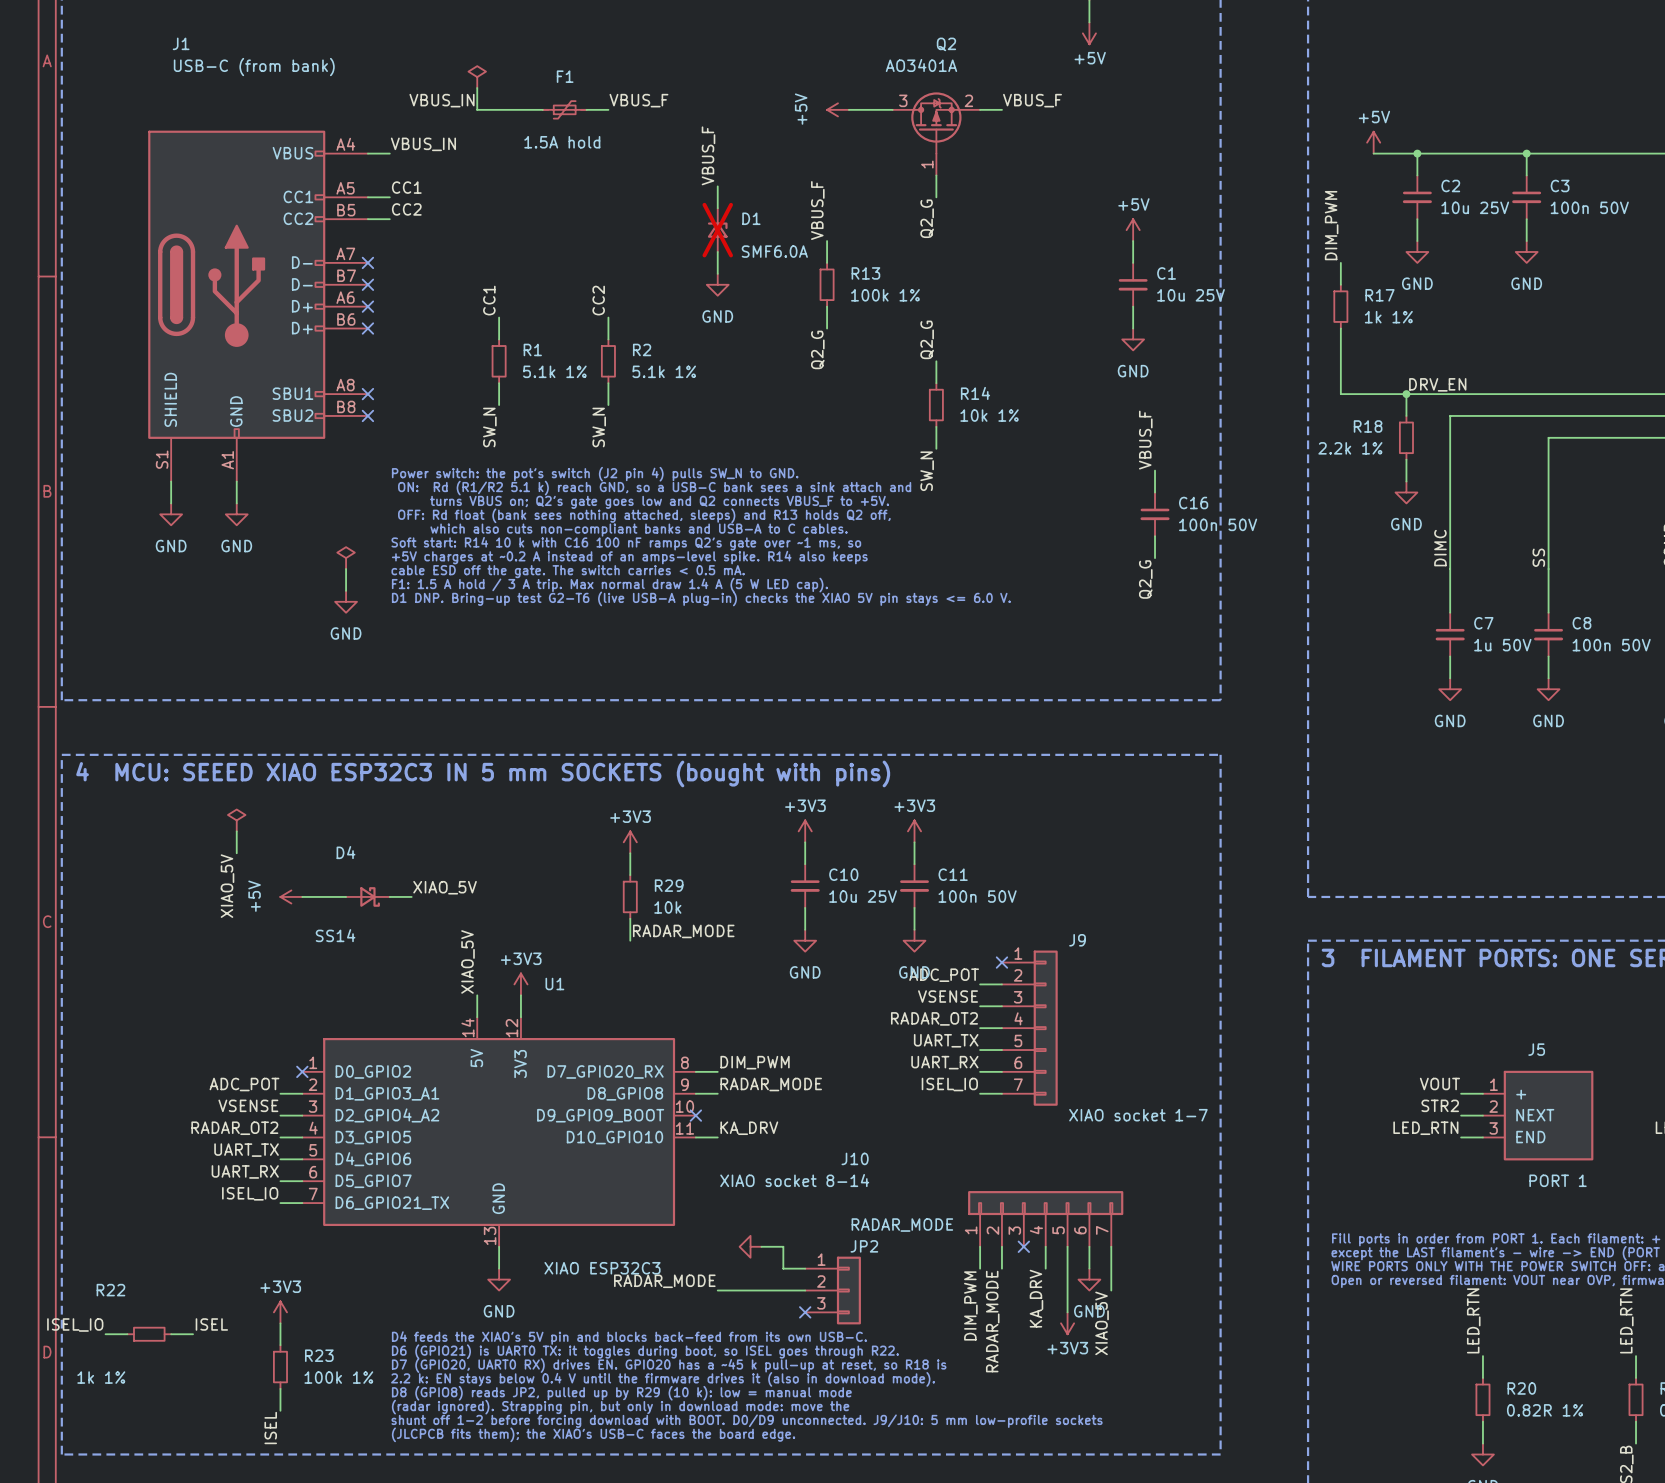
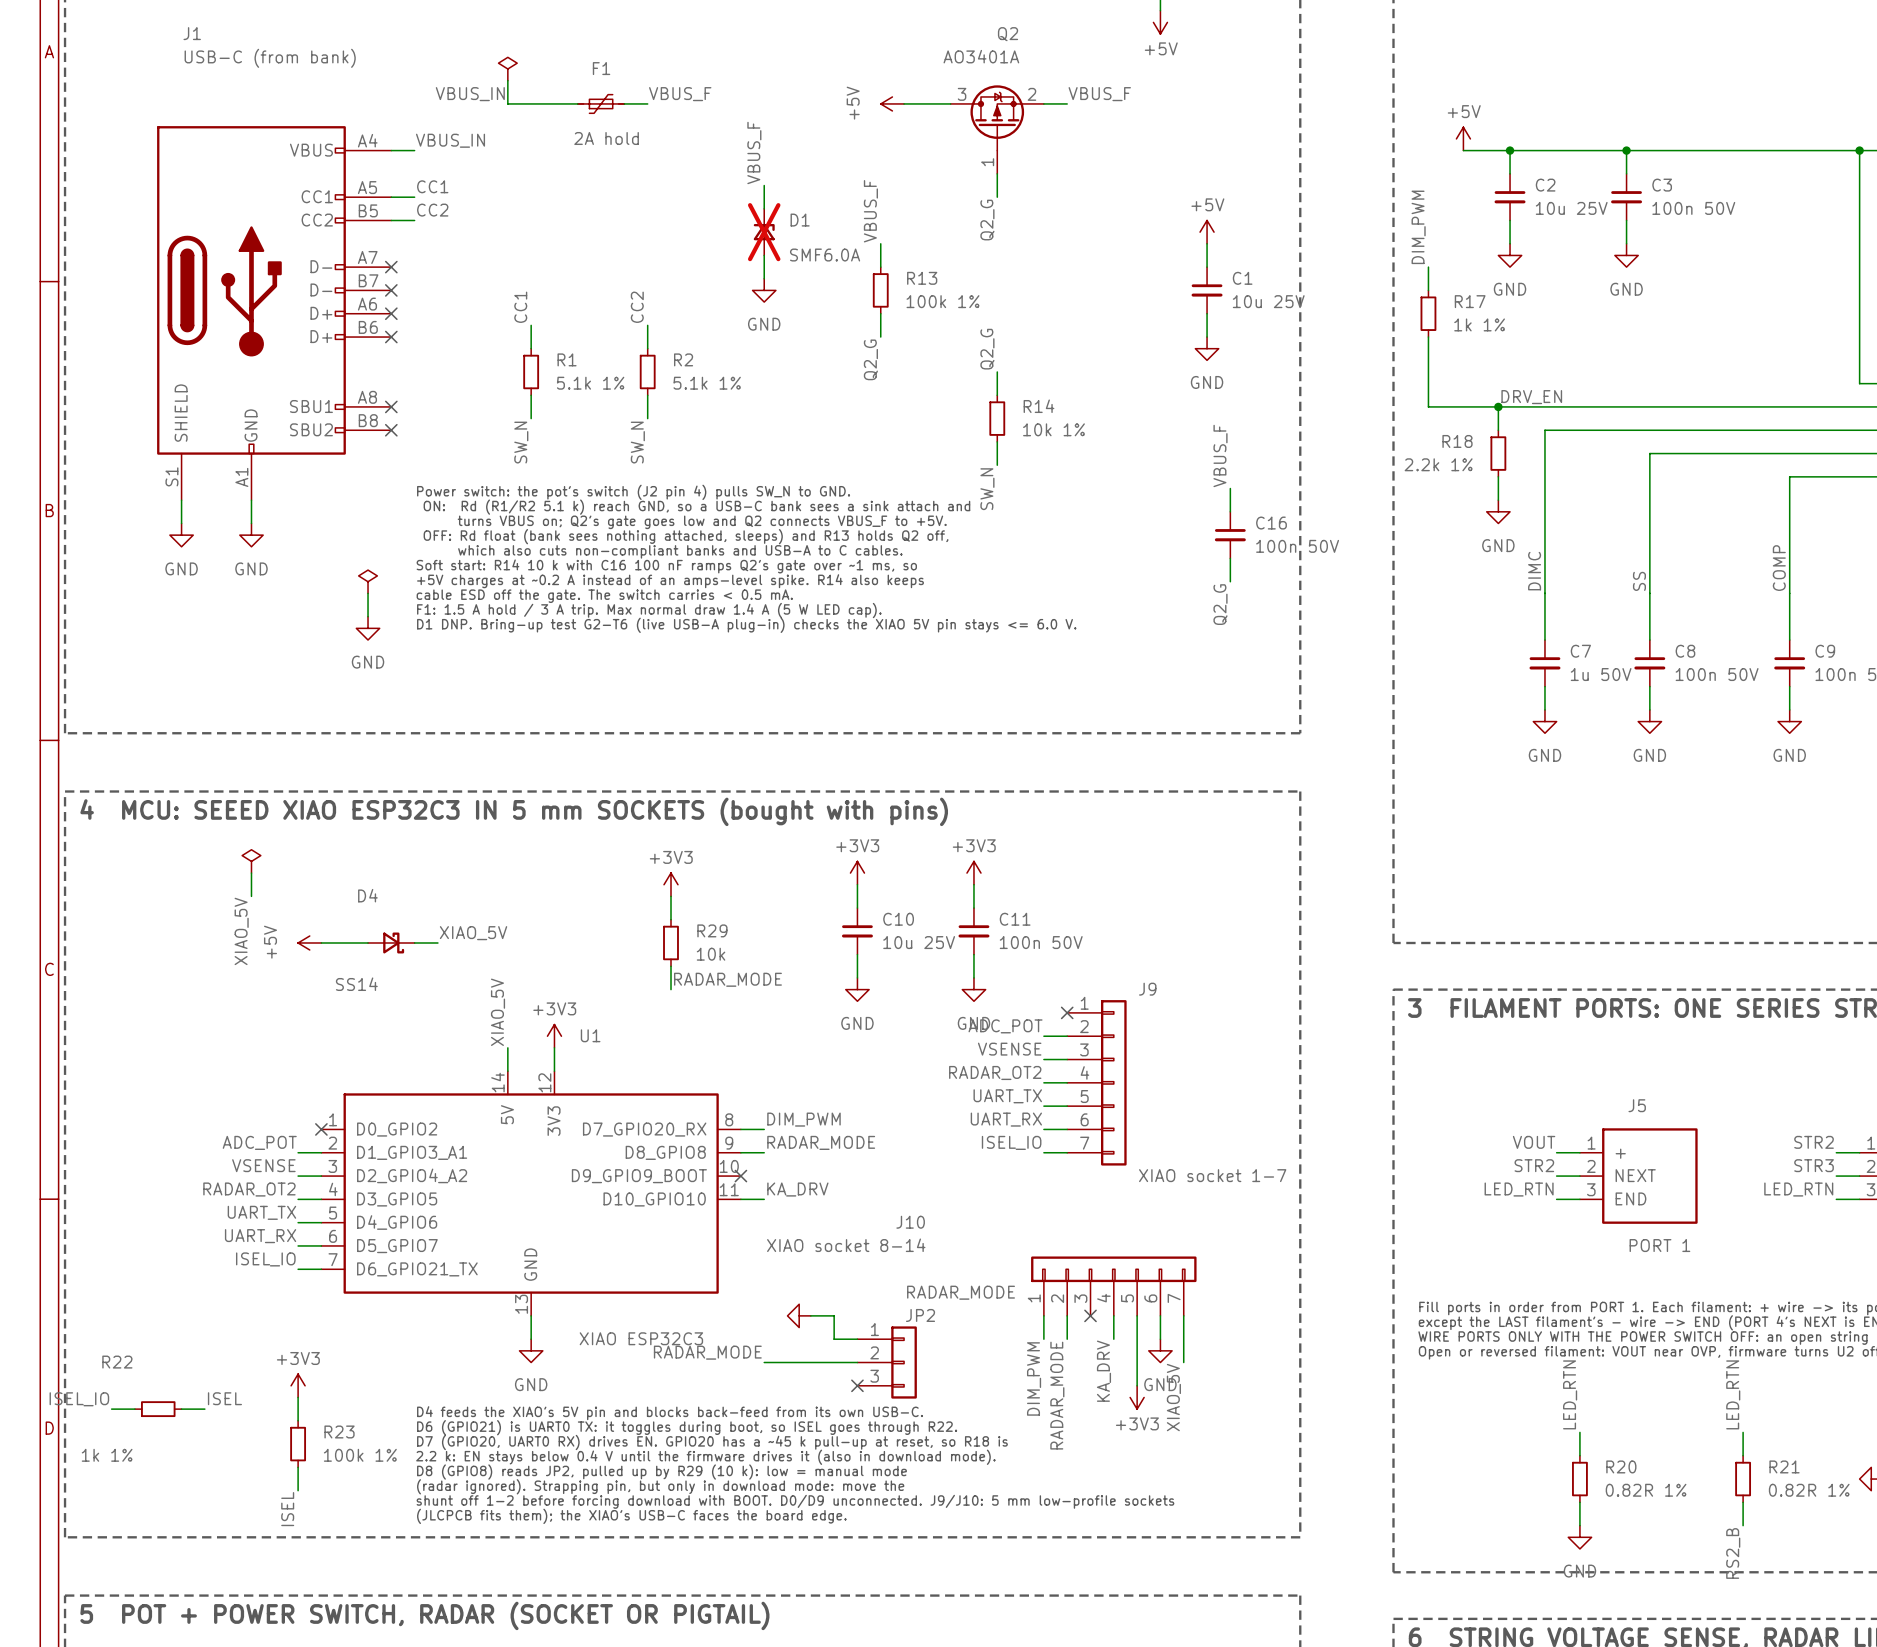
F1 value: 1.5A hold (562, 142) -> 2A hold (606, 138)

